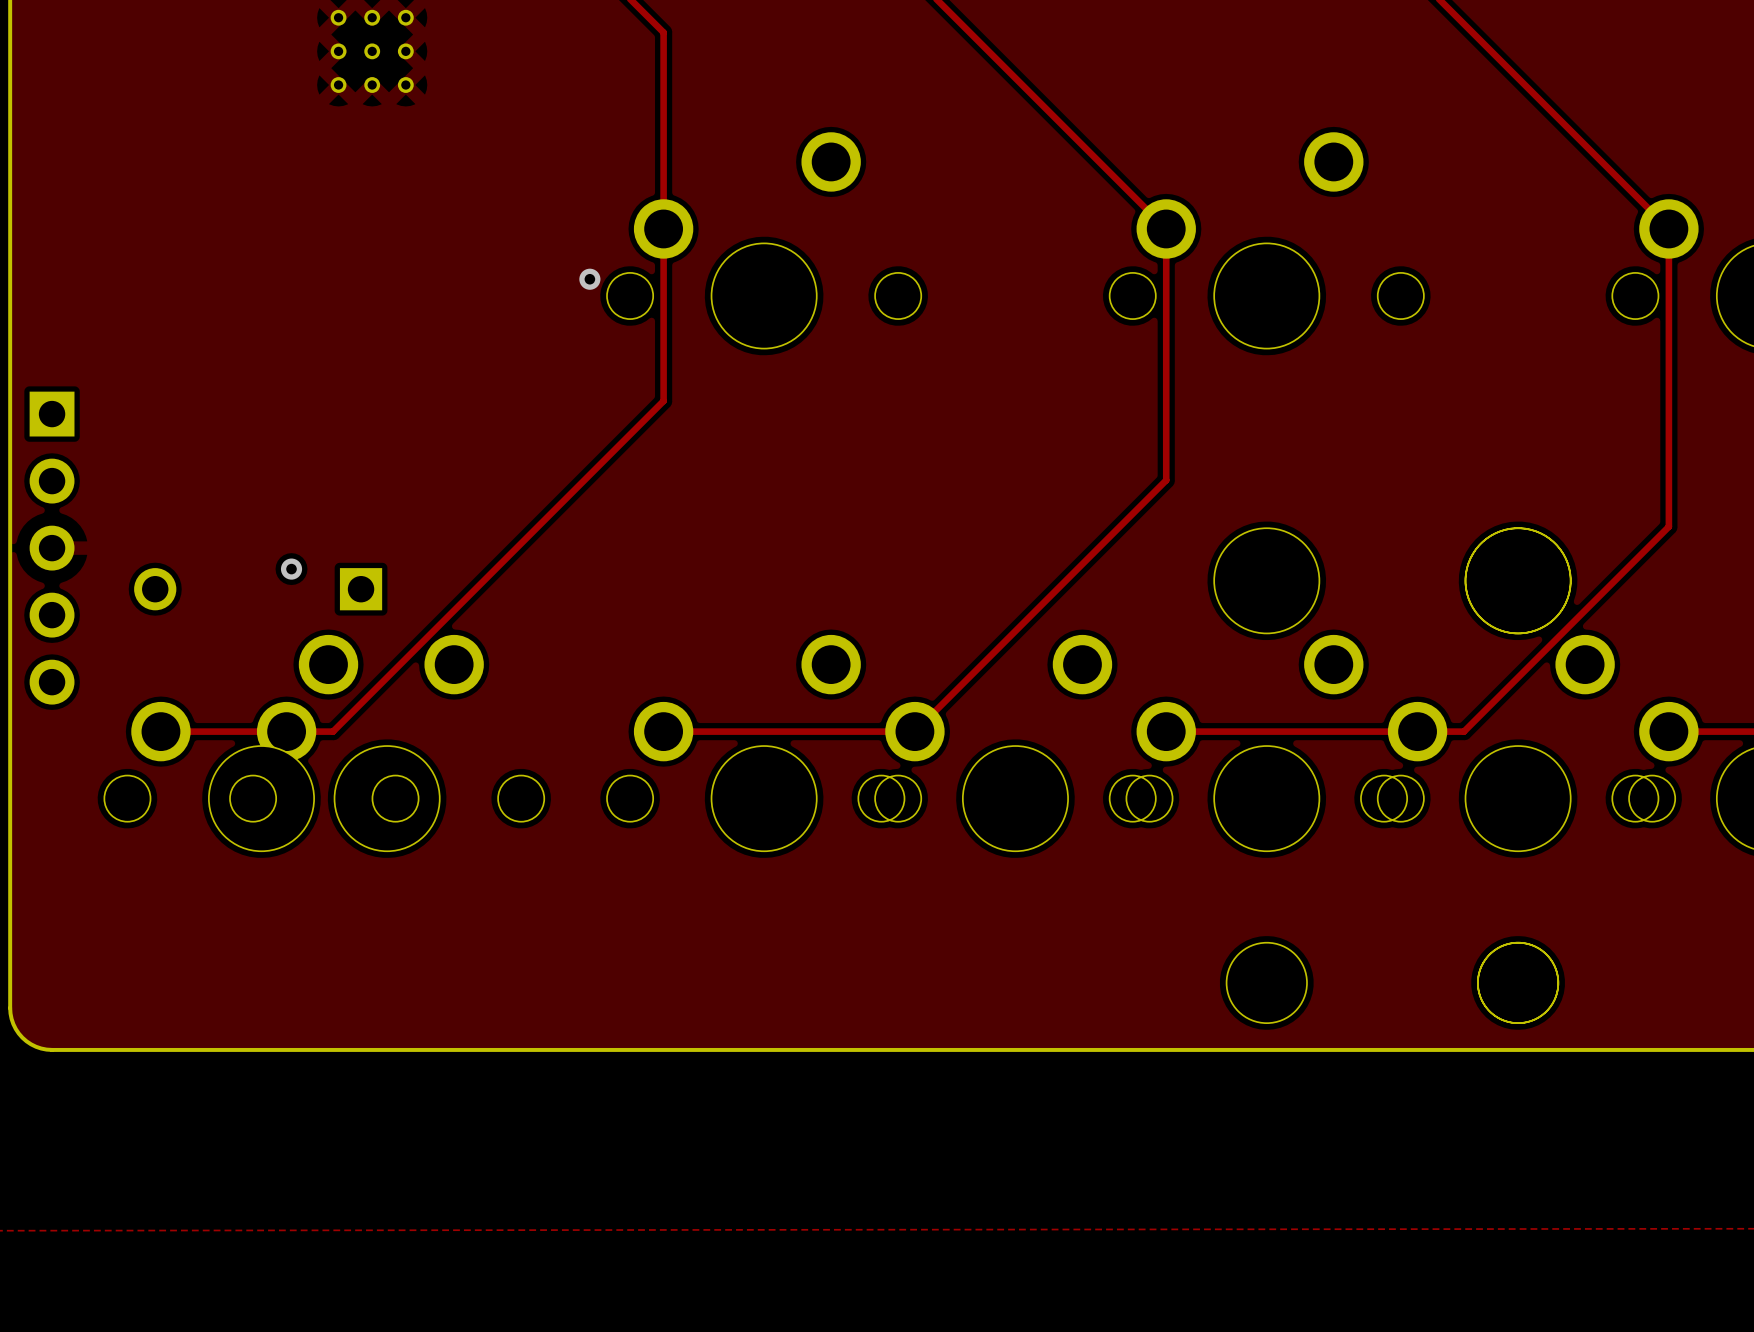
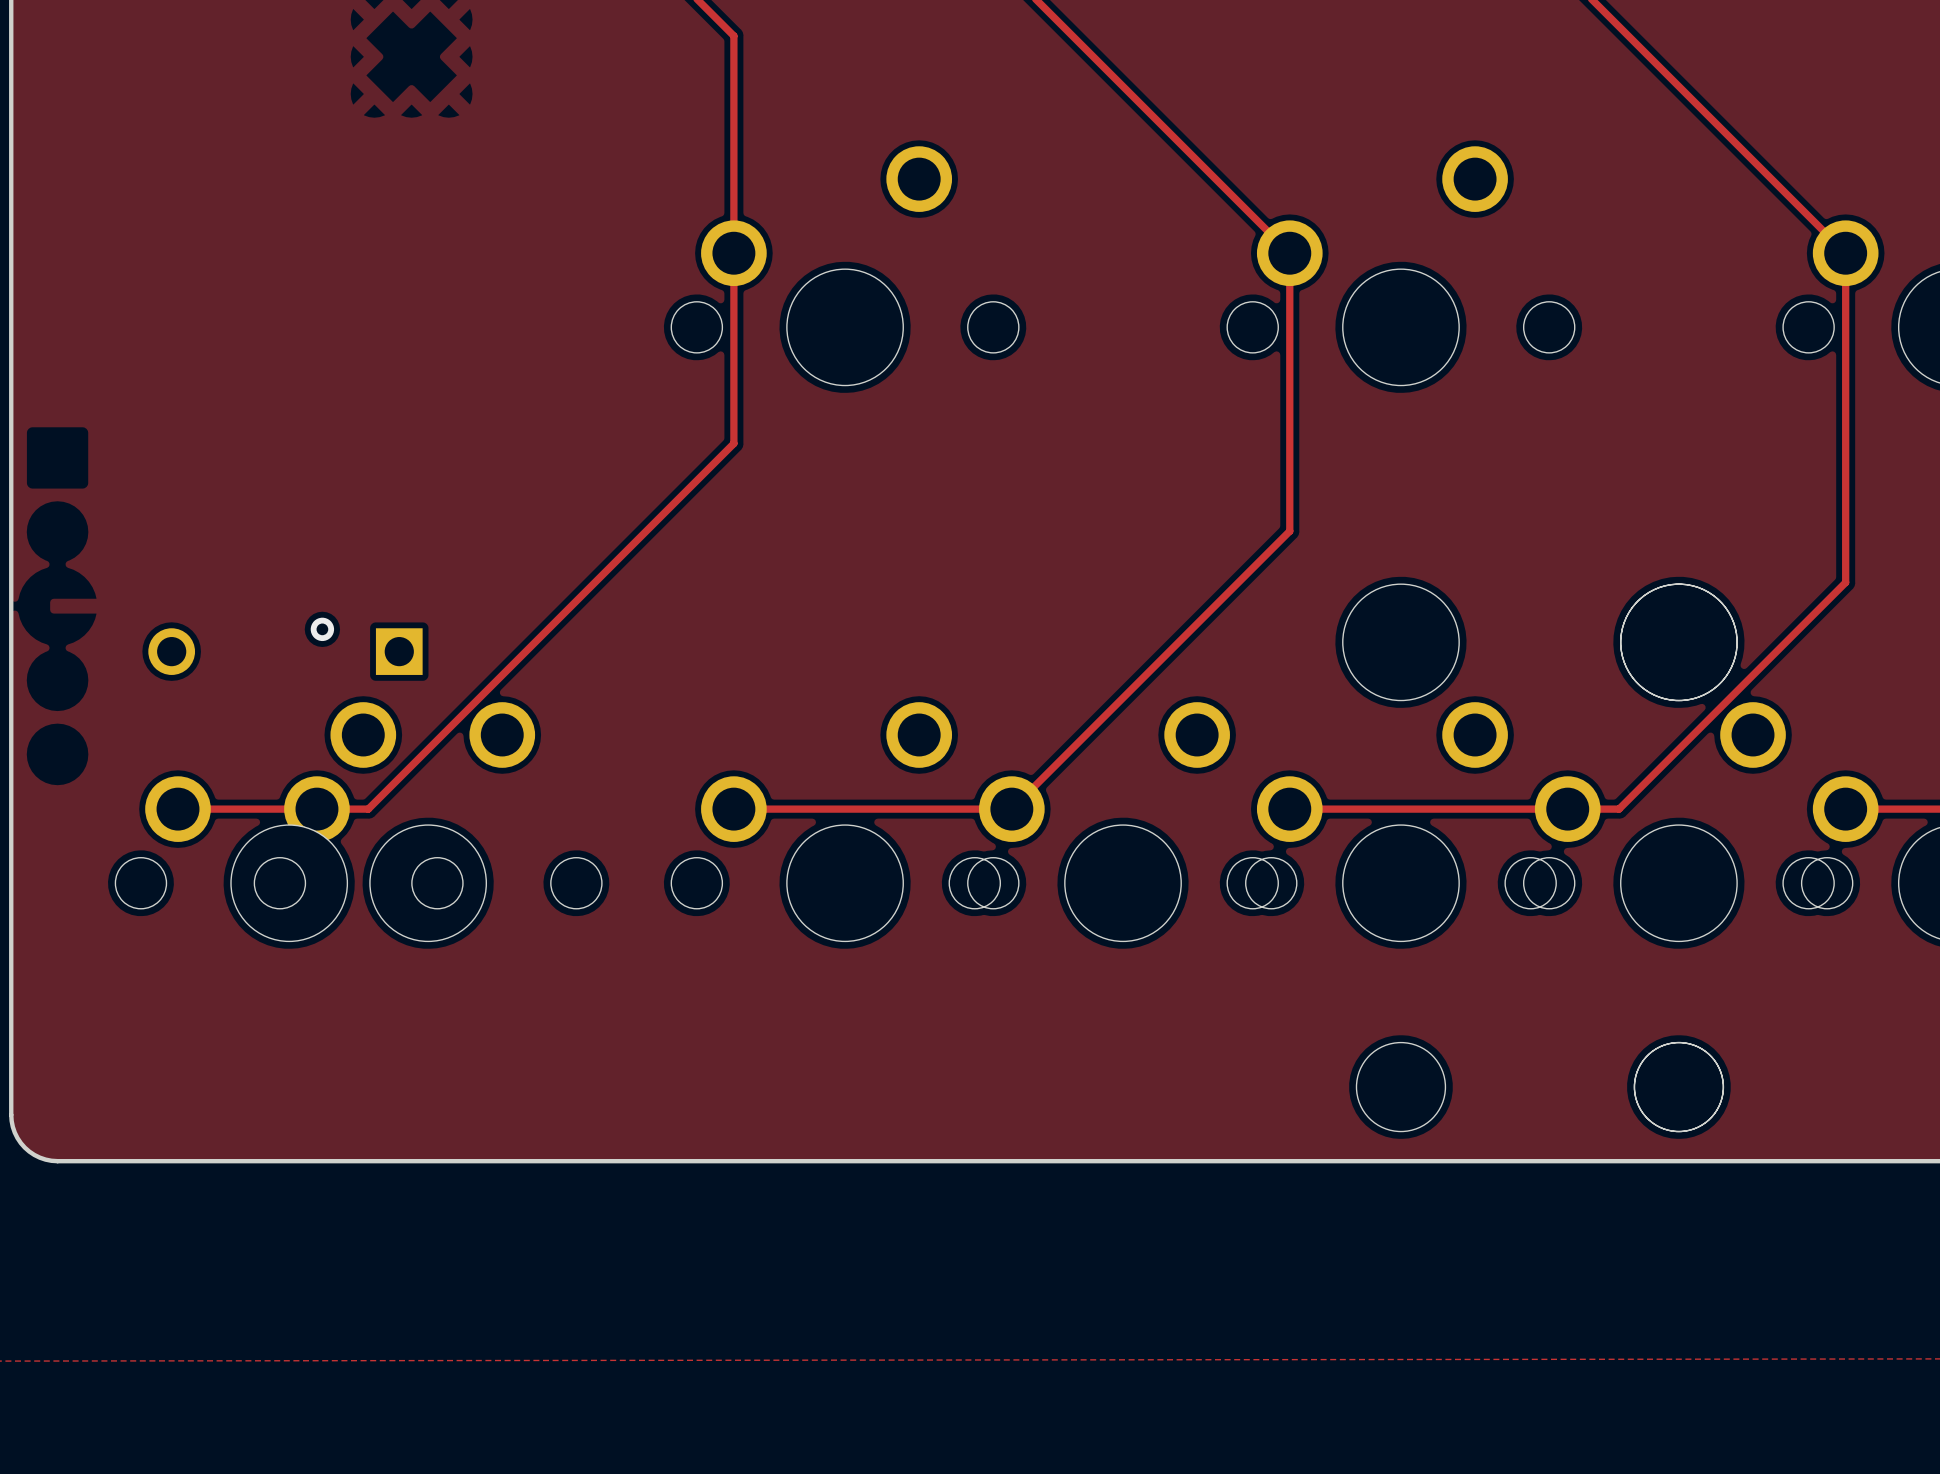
part: (372, 51) -> none
via: (589, 279) -> none
part: (52, 548) -> none

